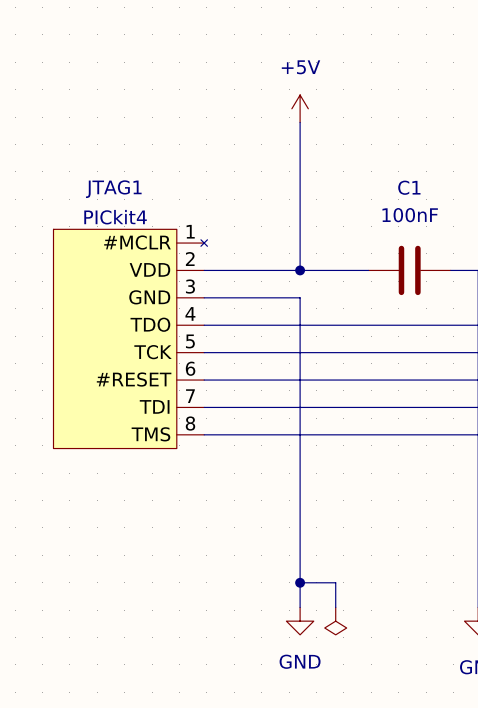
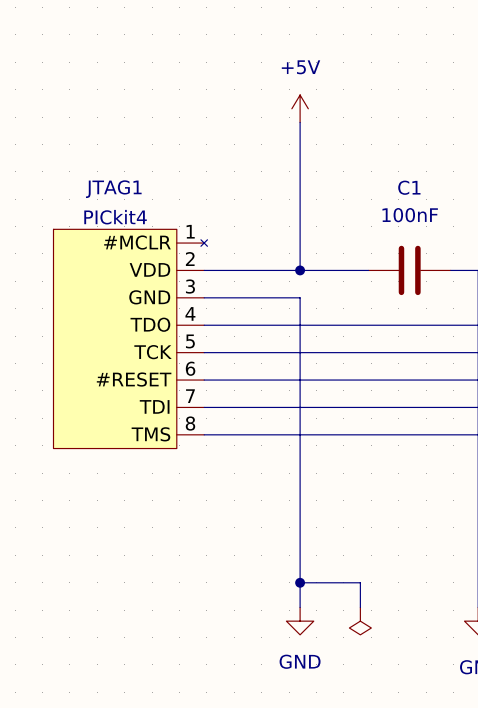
wire: (335, 582) (335, 607) -> (335, 582) (360, 582) (360, 607)
power symbol position: (335, 621) -> (360, 621)

